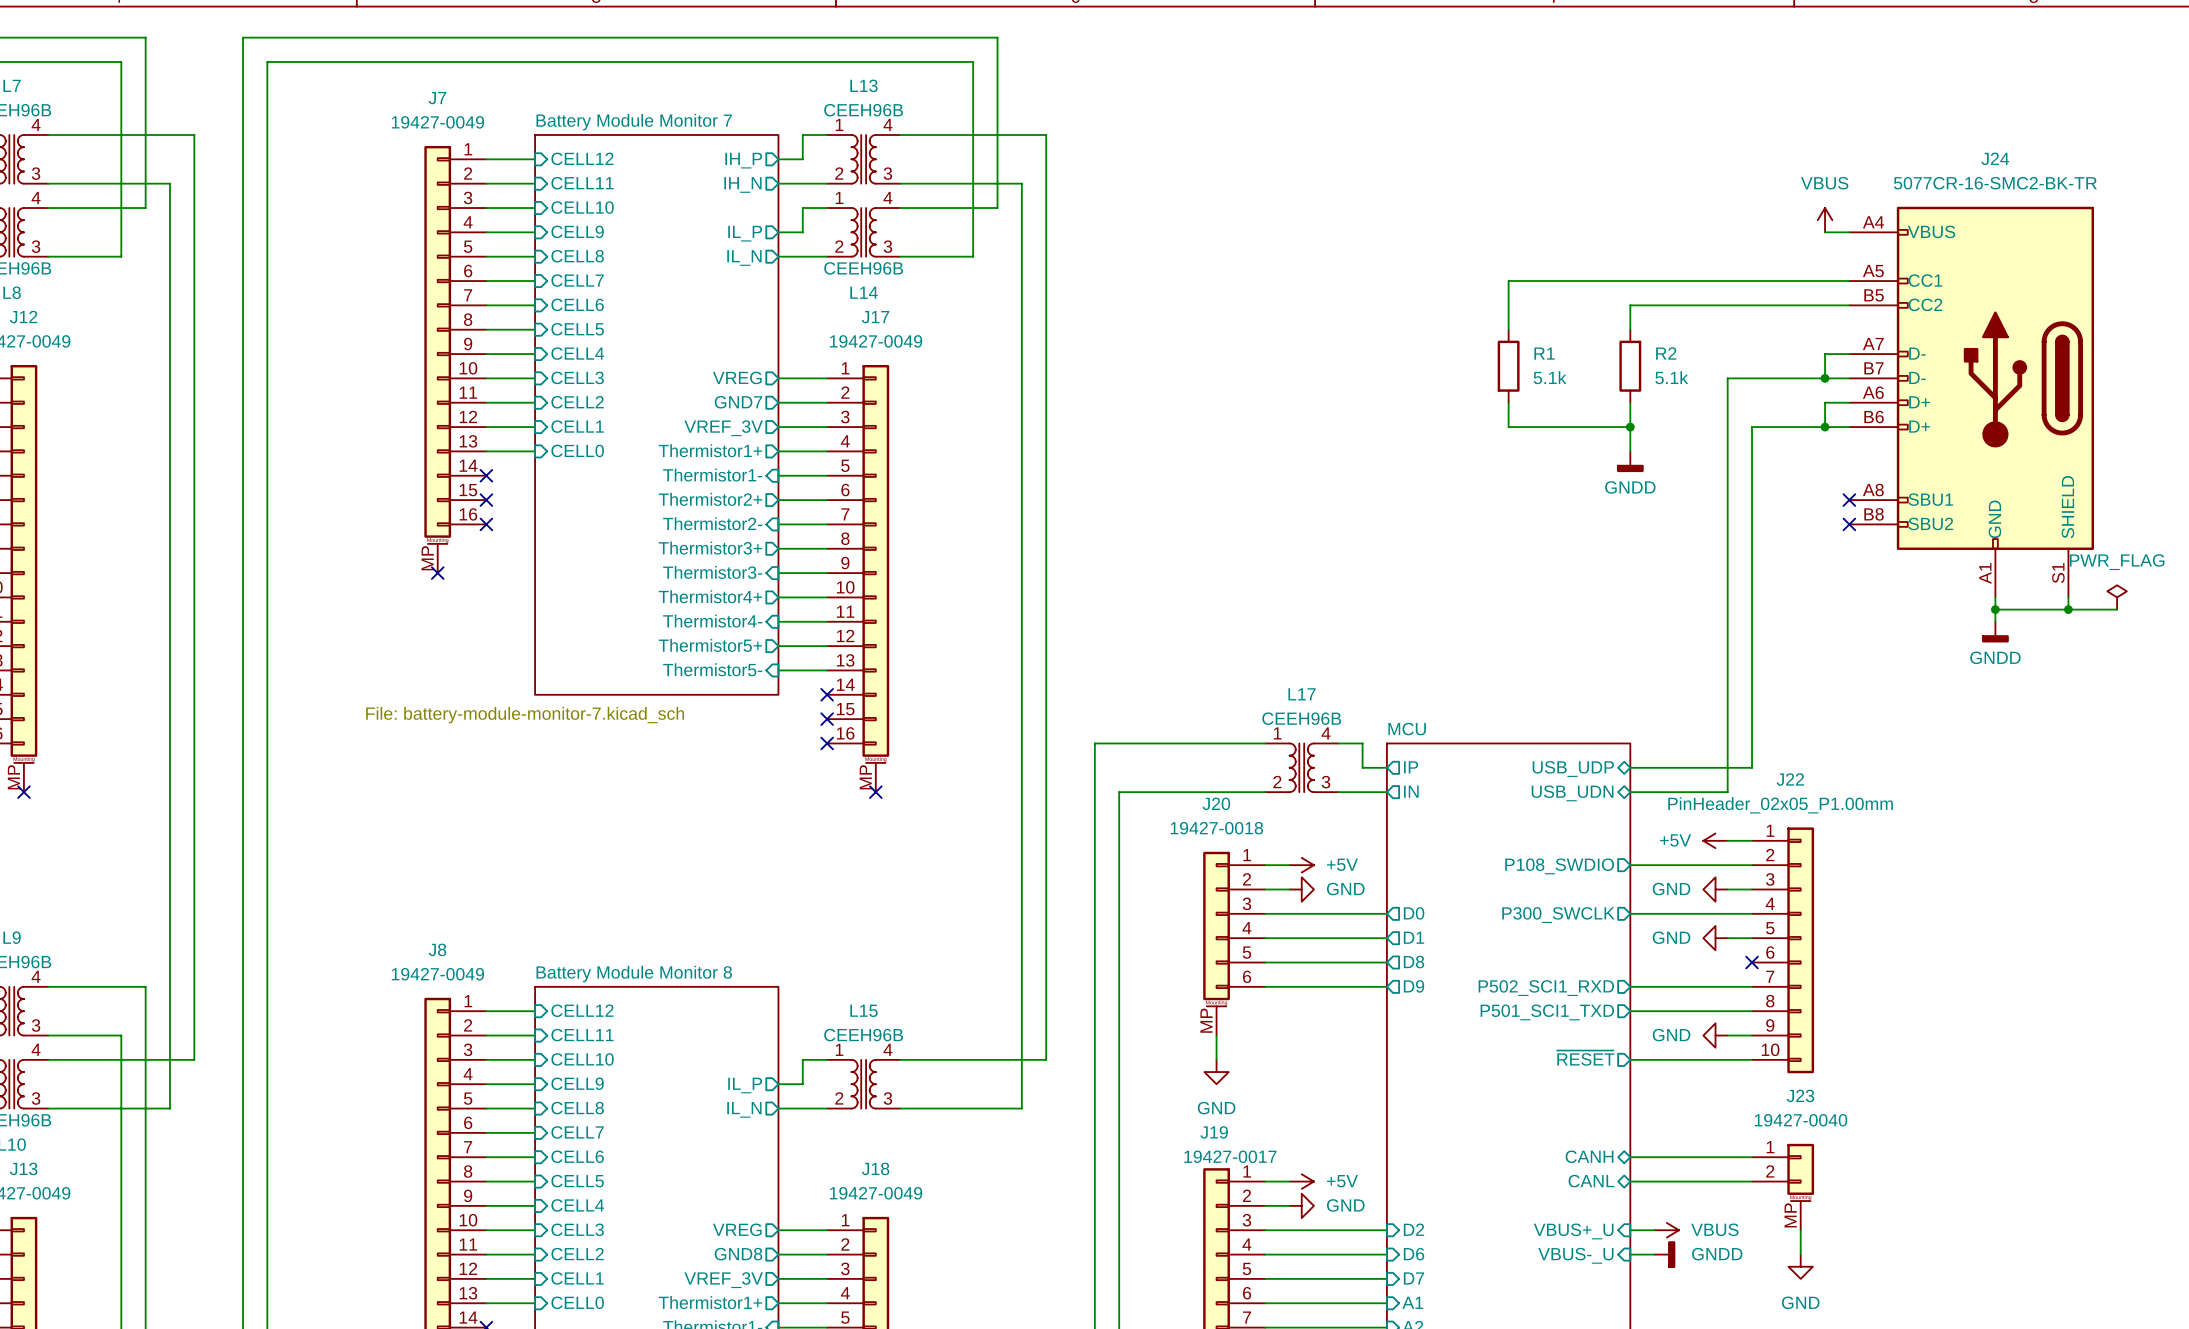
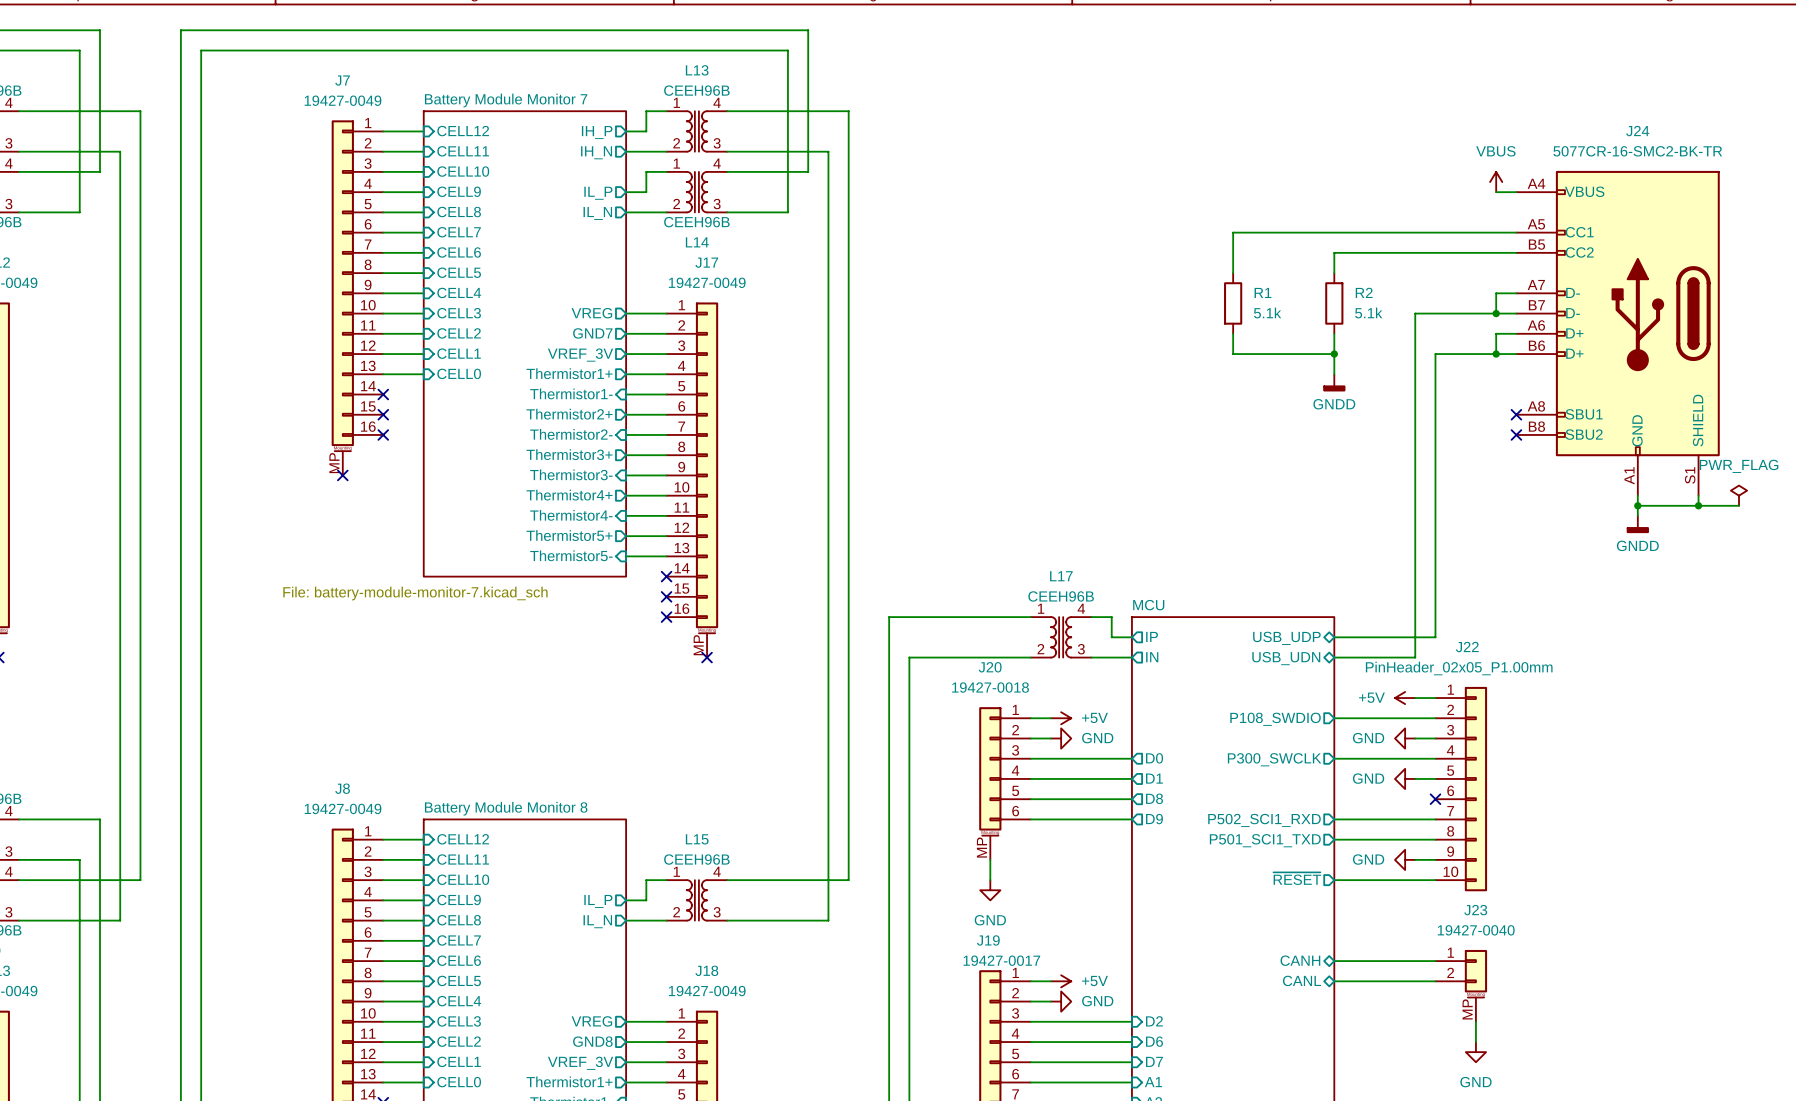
wire: (1630, 1230) (1654, 1230) -> none
power symbol: VBUS (1666, 1230) -> none
sheet pin: VBUS+_U (1573, 1231) -> none
wire: (1630, 1254) (1654, 1254) -> none
power symbol: GNDD (1665, 1254) -> none
sheet pin: VBUS-_U (1575, 1255) -> none

